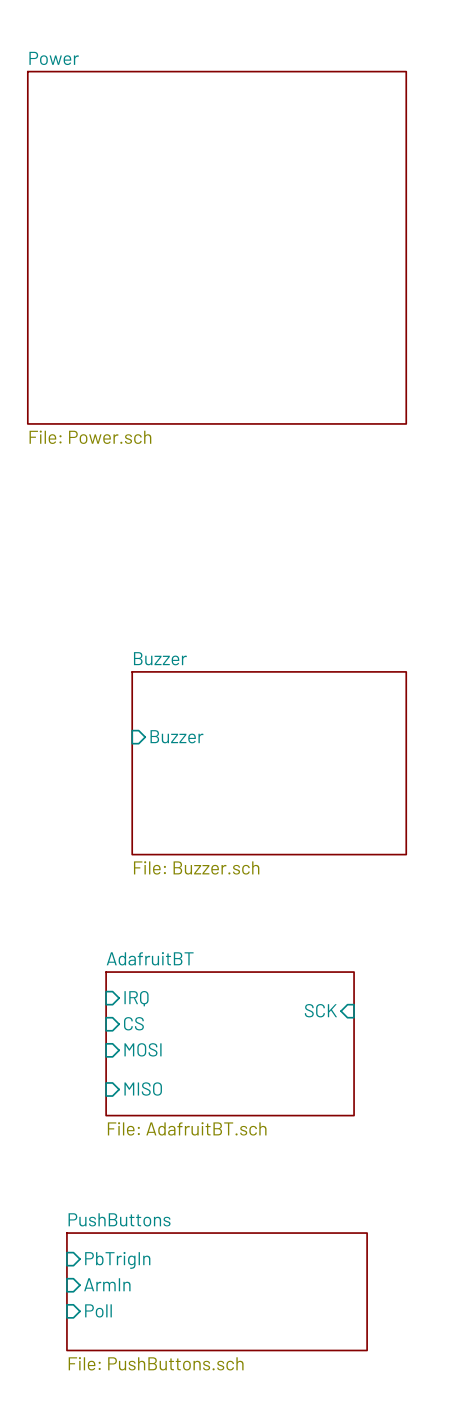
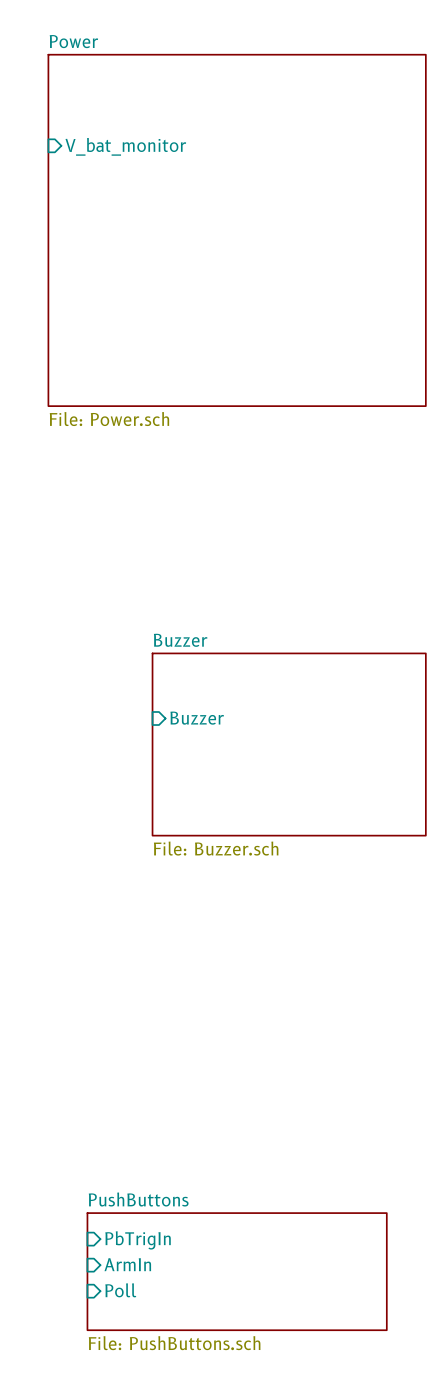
sheet pin: none -> V_bat_monitor (125, 146)
sheet pin: IRQ (136, 998) -> none
sheet pin: SCK (320, 1010) -> none
sheet pin: CS (133, 1023) -> none
sheet AdafruitBT: File: AdafruitBT.sch (230, 1043) -> none
sheet pin: MOSI (142, 1049) -> none
sheet pin: MISO (143, 1089) -> none

